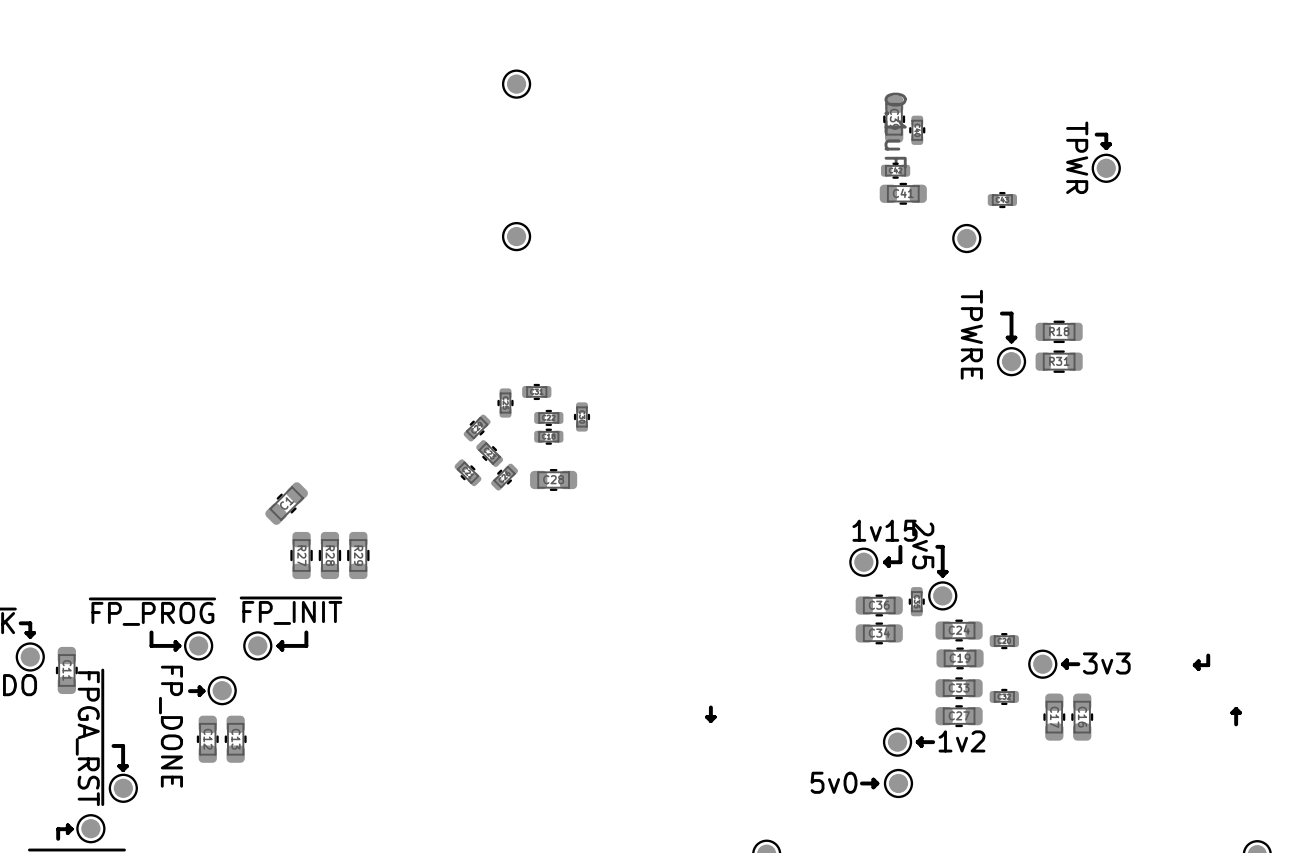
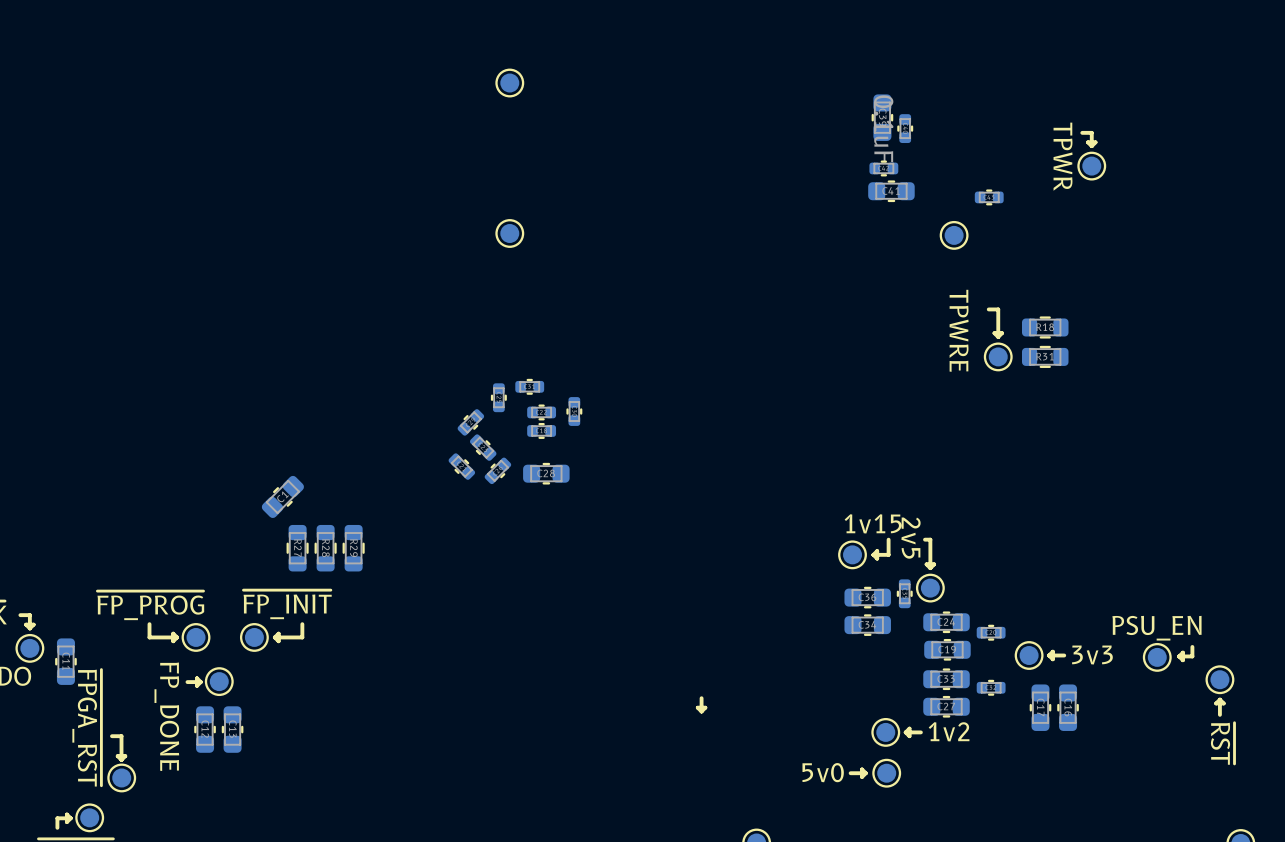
part: none -> PSU_EN (1157, 657)
part: none -> ~{RST} (1219, 679)

